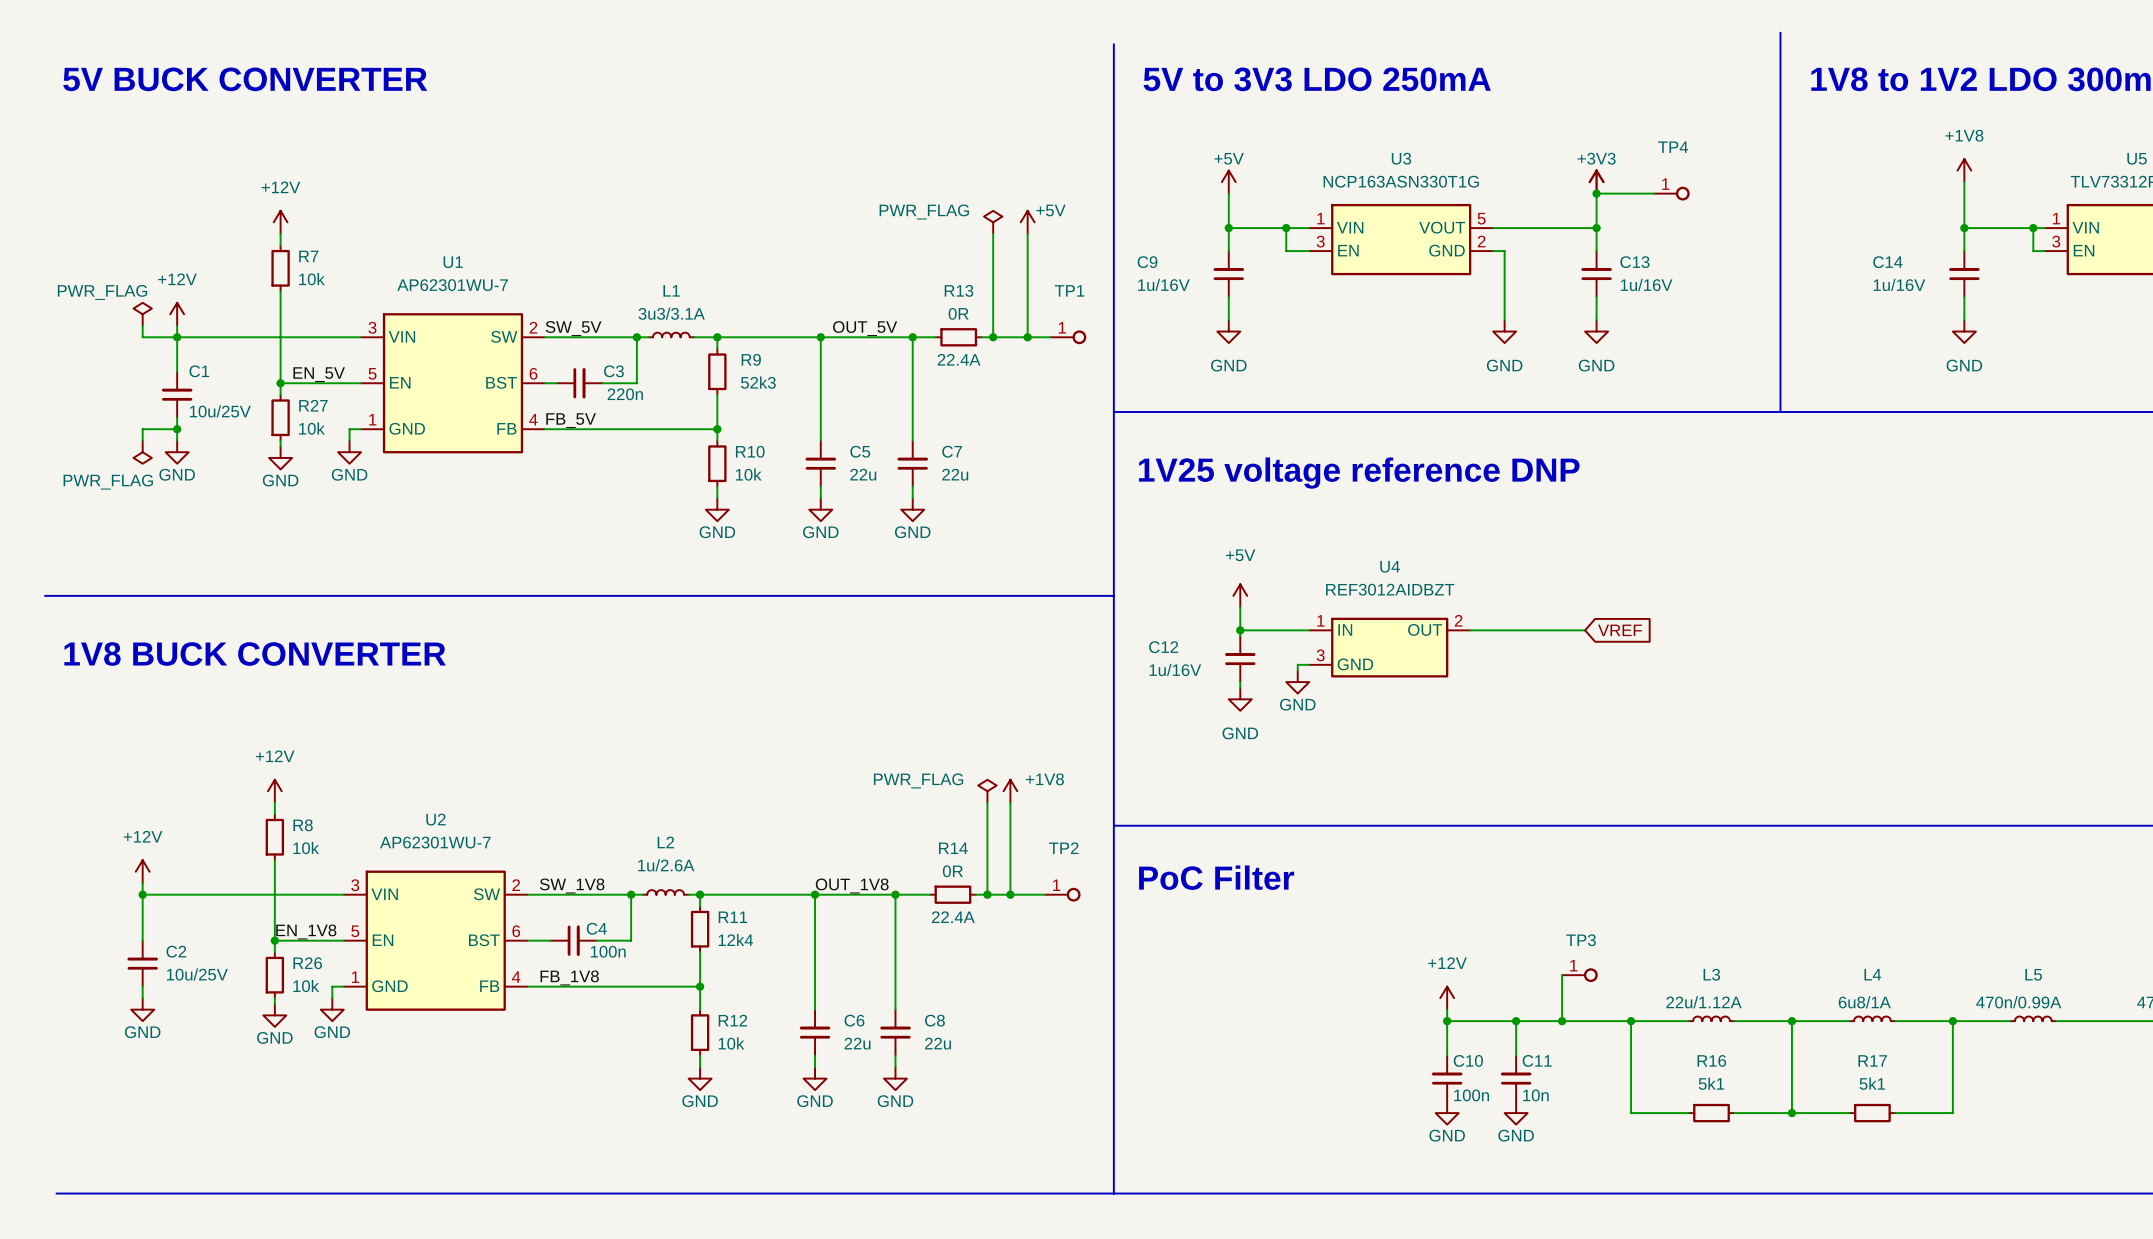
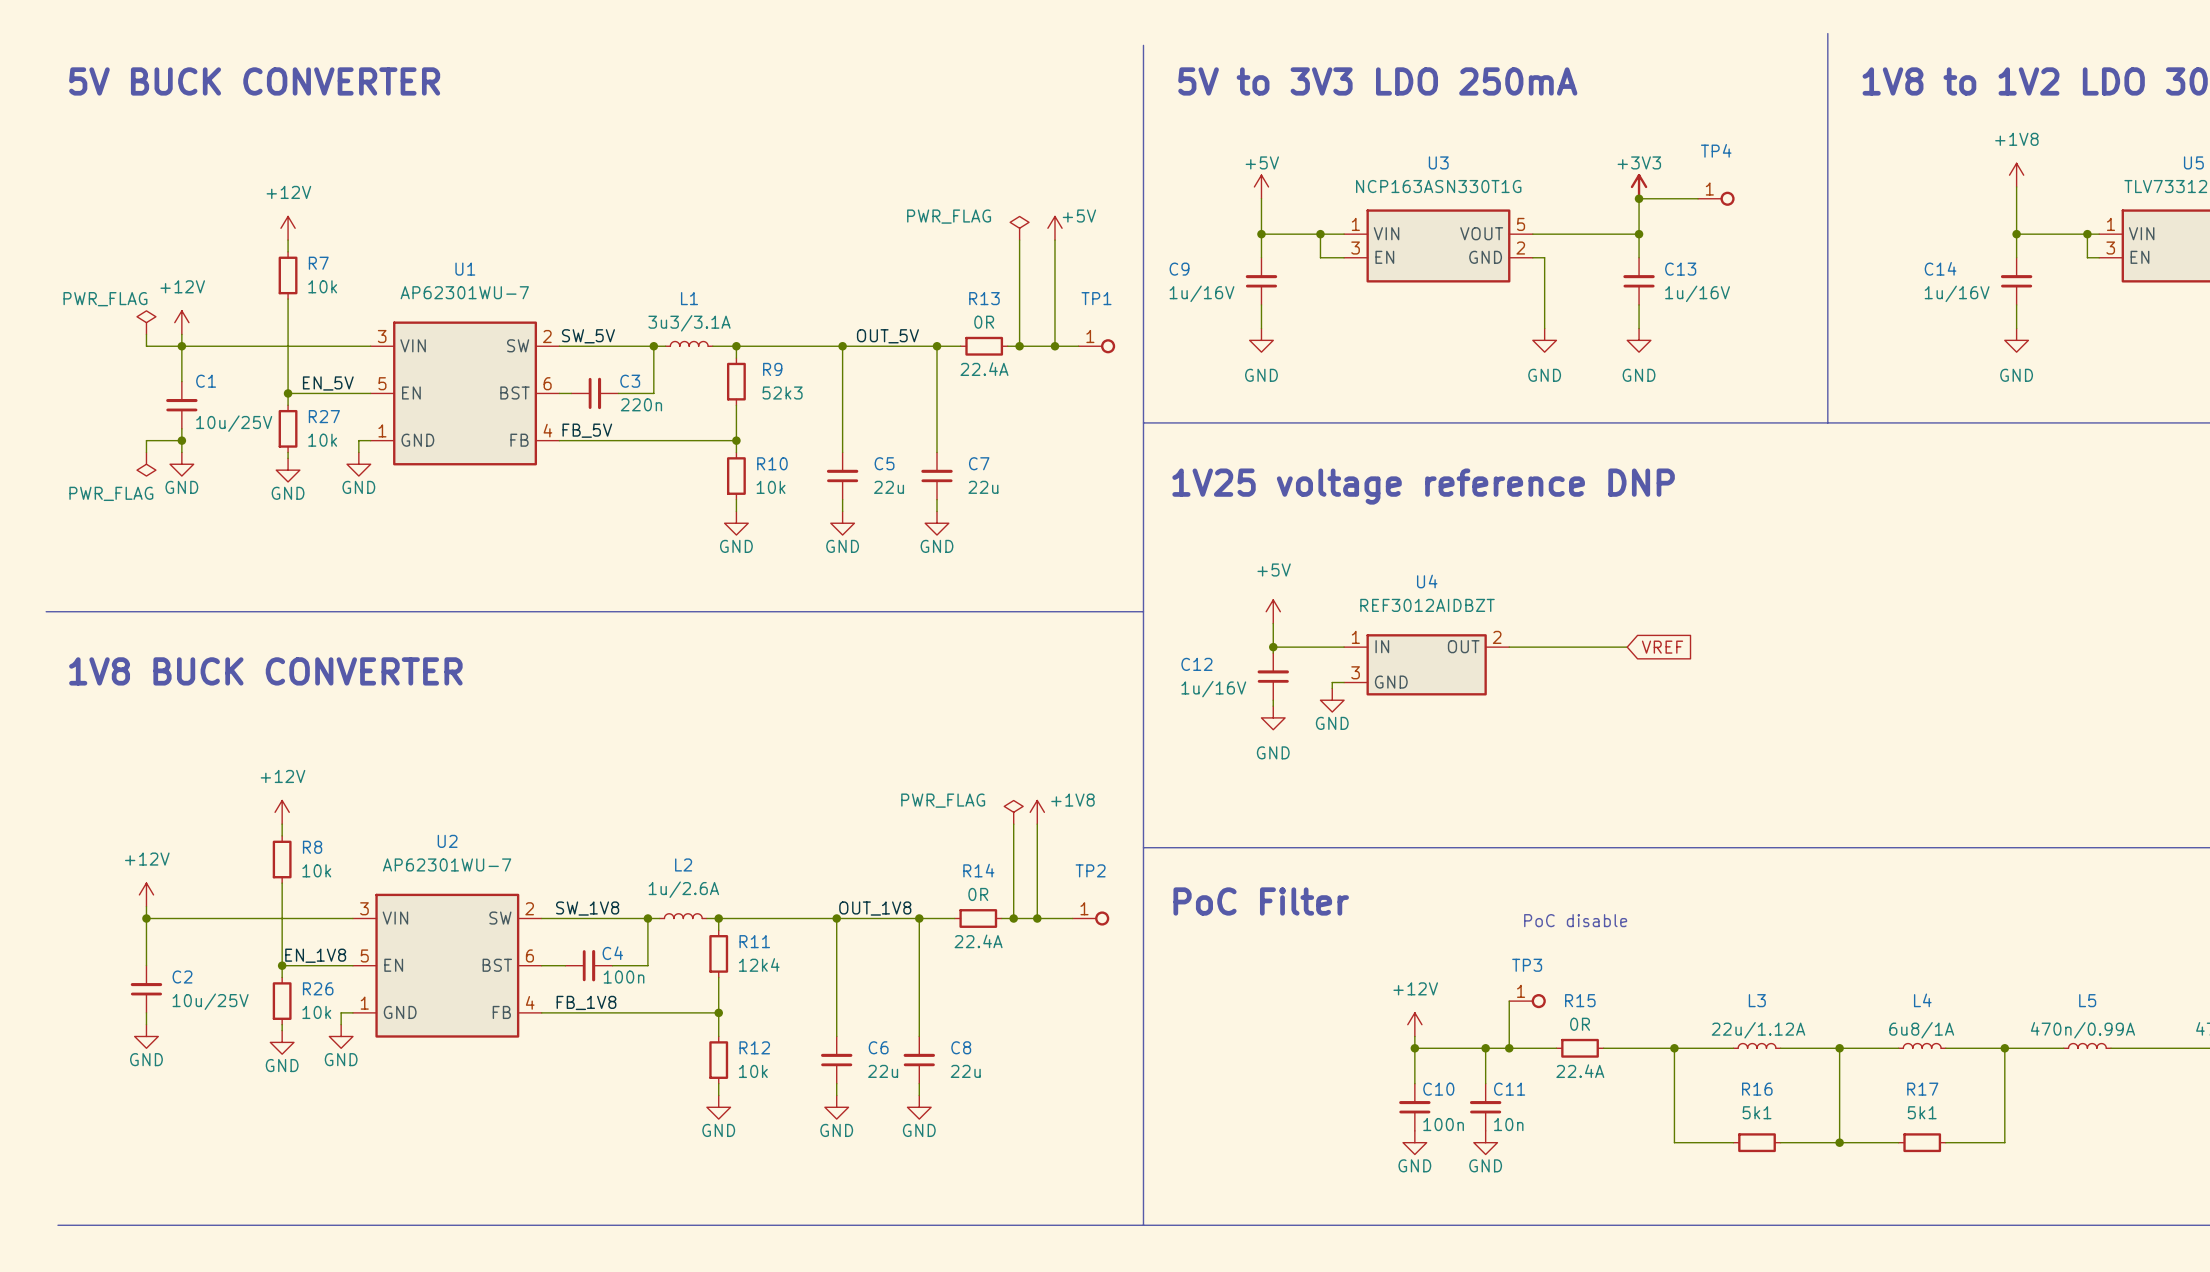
text: none -> PoC disable (1575, 920)
wire: none -> (1509, 1001) (1509, 1048)
wire: (1562, 975) (1562, 1021) (1516, 1021) (1516, 1055) -> none
TP3 position: (1579, 975) -> (1527, 1001)
power symbol position: +12V (1447, 998) -> +12V (1414, 1024)
wire: none -> (1414, 1036) (1414, 1083)
wire: (1447, 1009) (1447, 1021) -> (1414, 1048) (1485, 1048)
junction: none -> (1414, 1048)
junction: none -> (1509, 1048)
junction: (1516, 1021) -> none
R15: none -> (1580, 1048)
junction: (1562, 1021) -> none
C10 name: C10 (1468, 1060) -> C11 (1509, 1089)
C10: none -> (1414, 1107)
C11: (1516, 1078) -> none
C10 text: 100n (1471, 1095) -> 10n (1508, 1124)
power symbol position: GND (1516, 1113) -> GND (1414, 1142)

